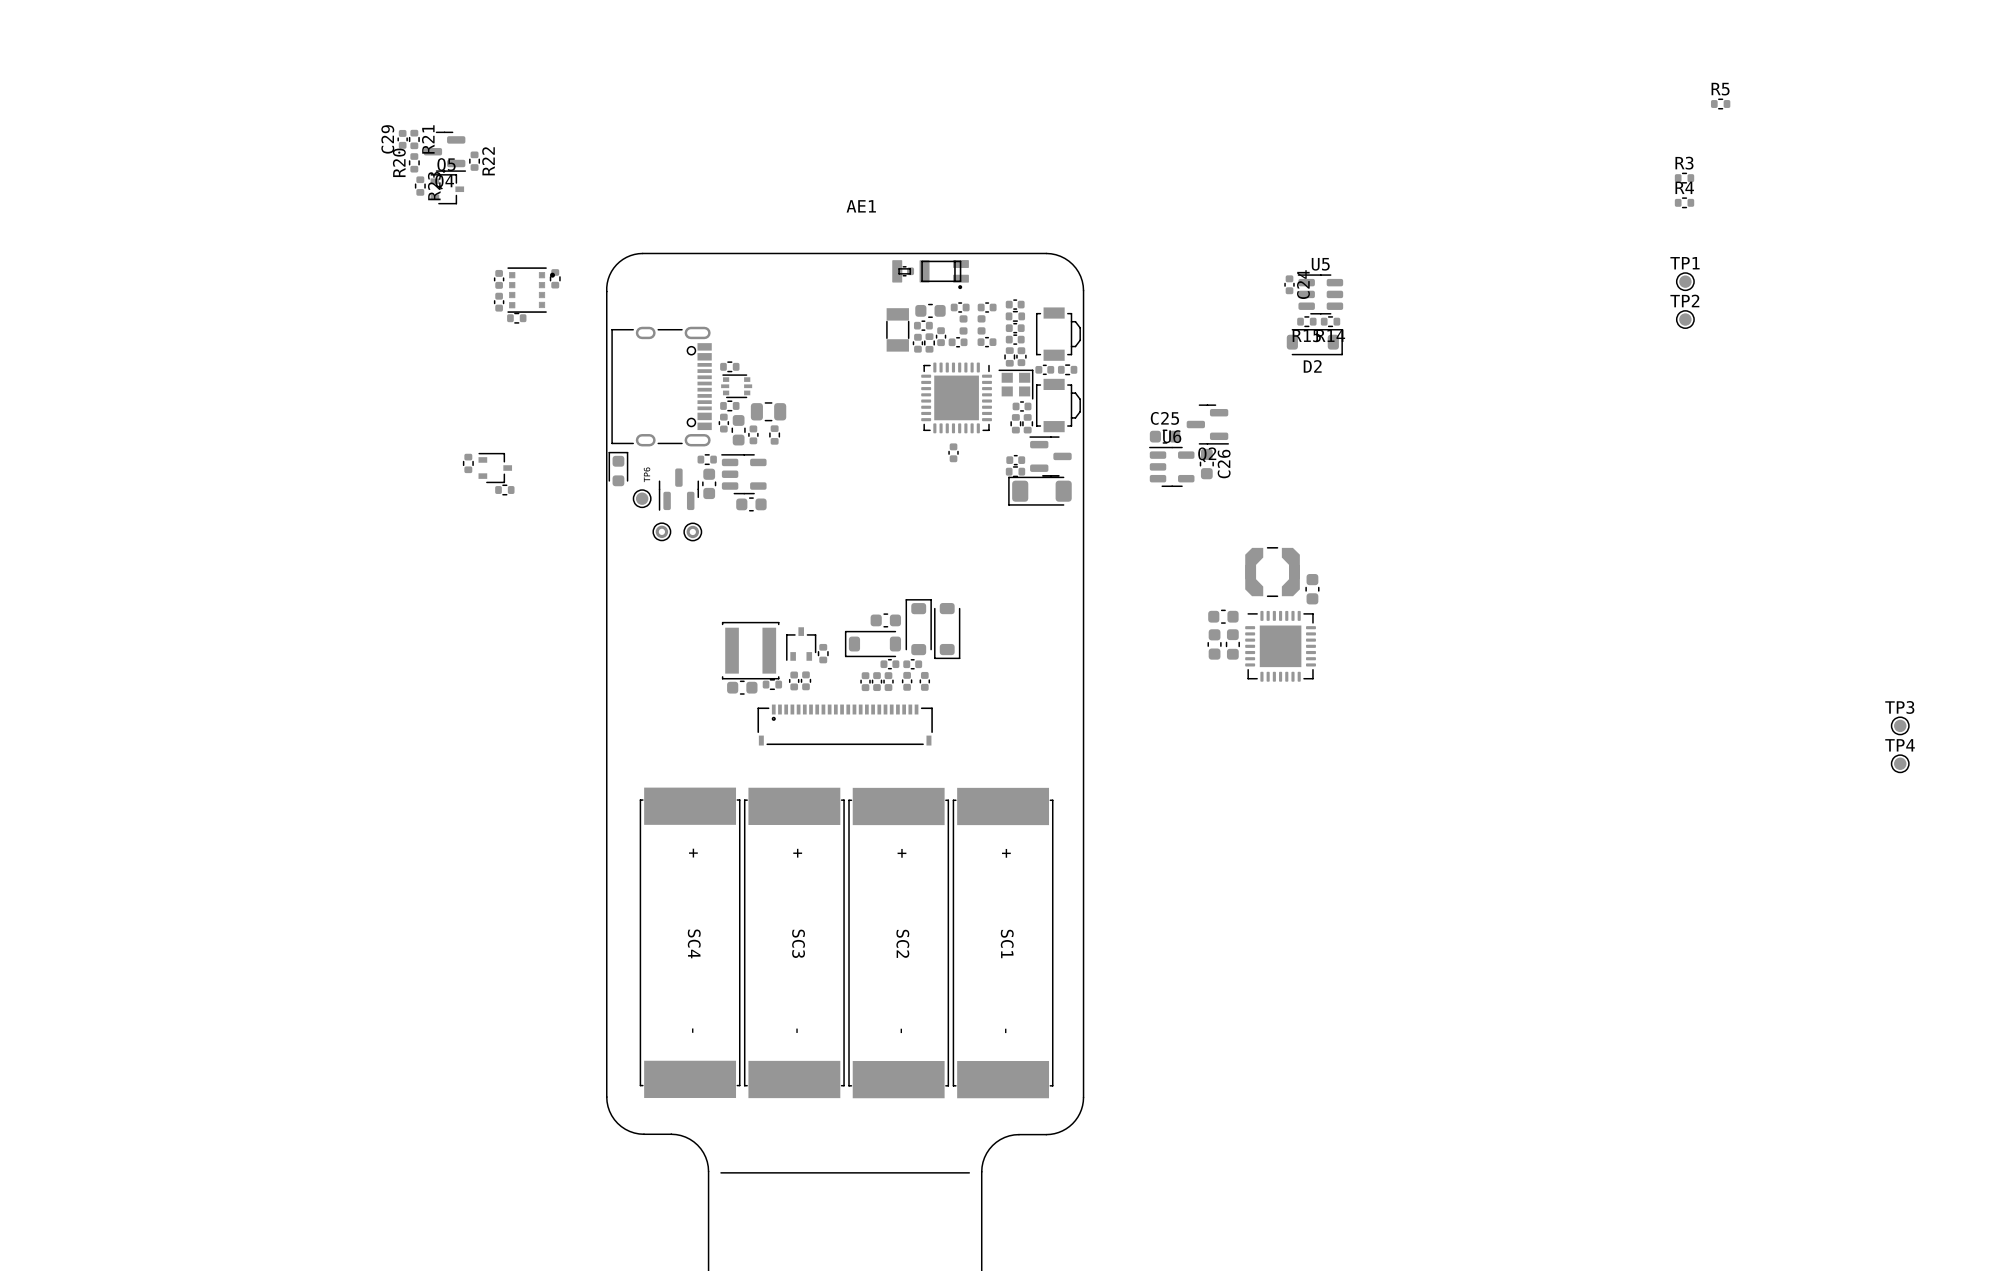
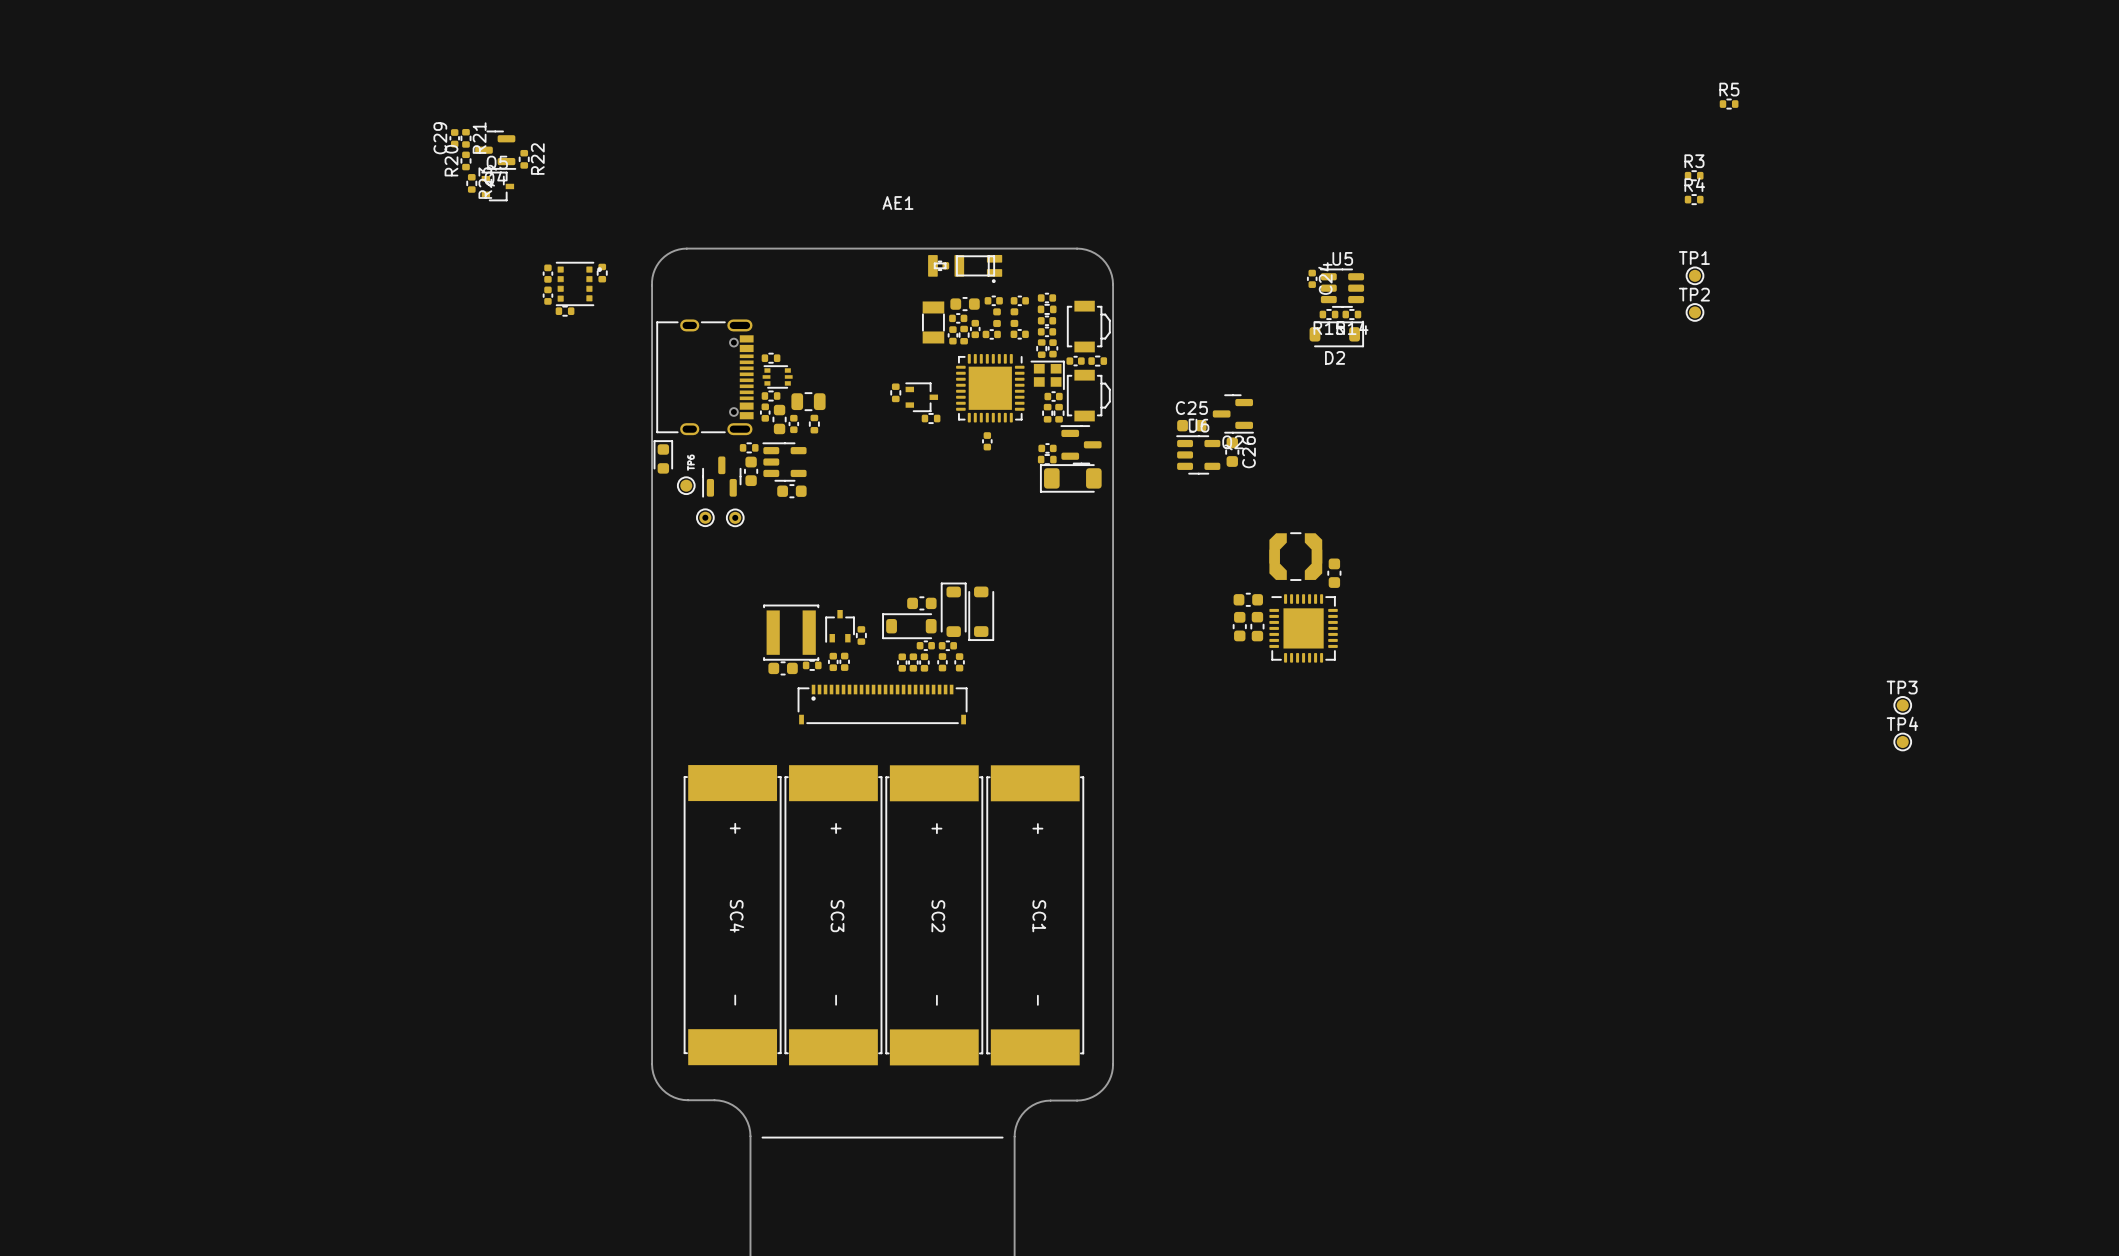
part: none -> (895, 392)
part: none -> (921, 397)
part: none -> (931, 418)
part: (468, 463) -> none
part: (495, 468) -> none
part: (504, 490) -> none

